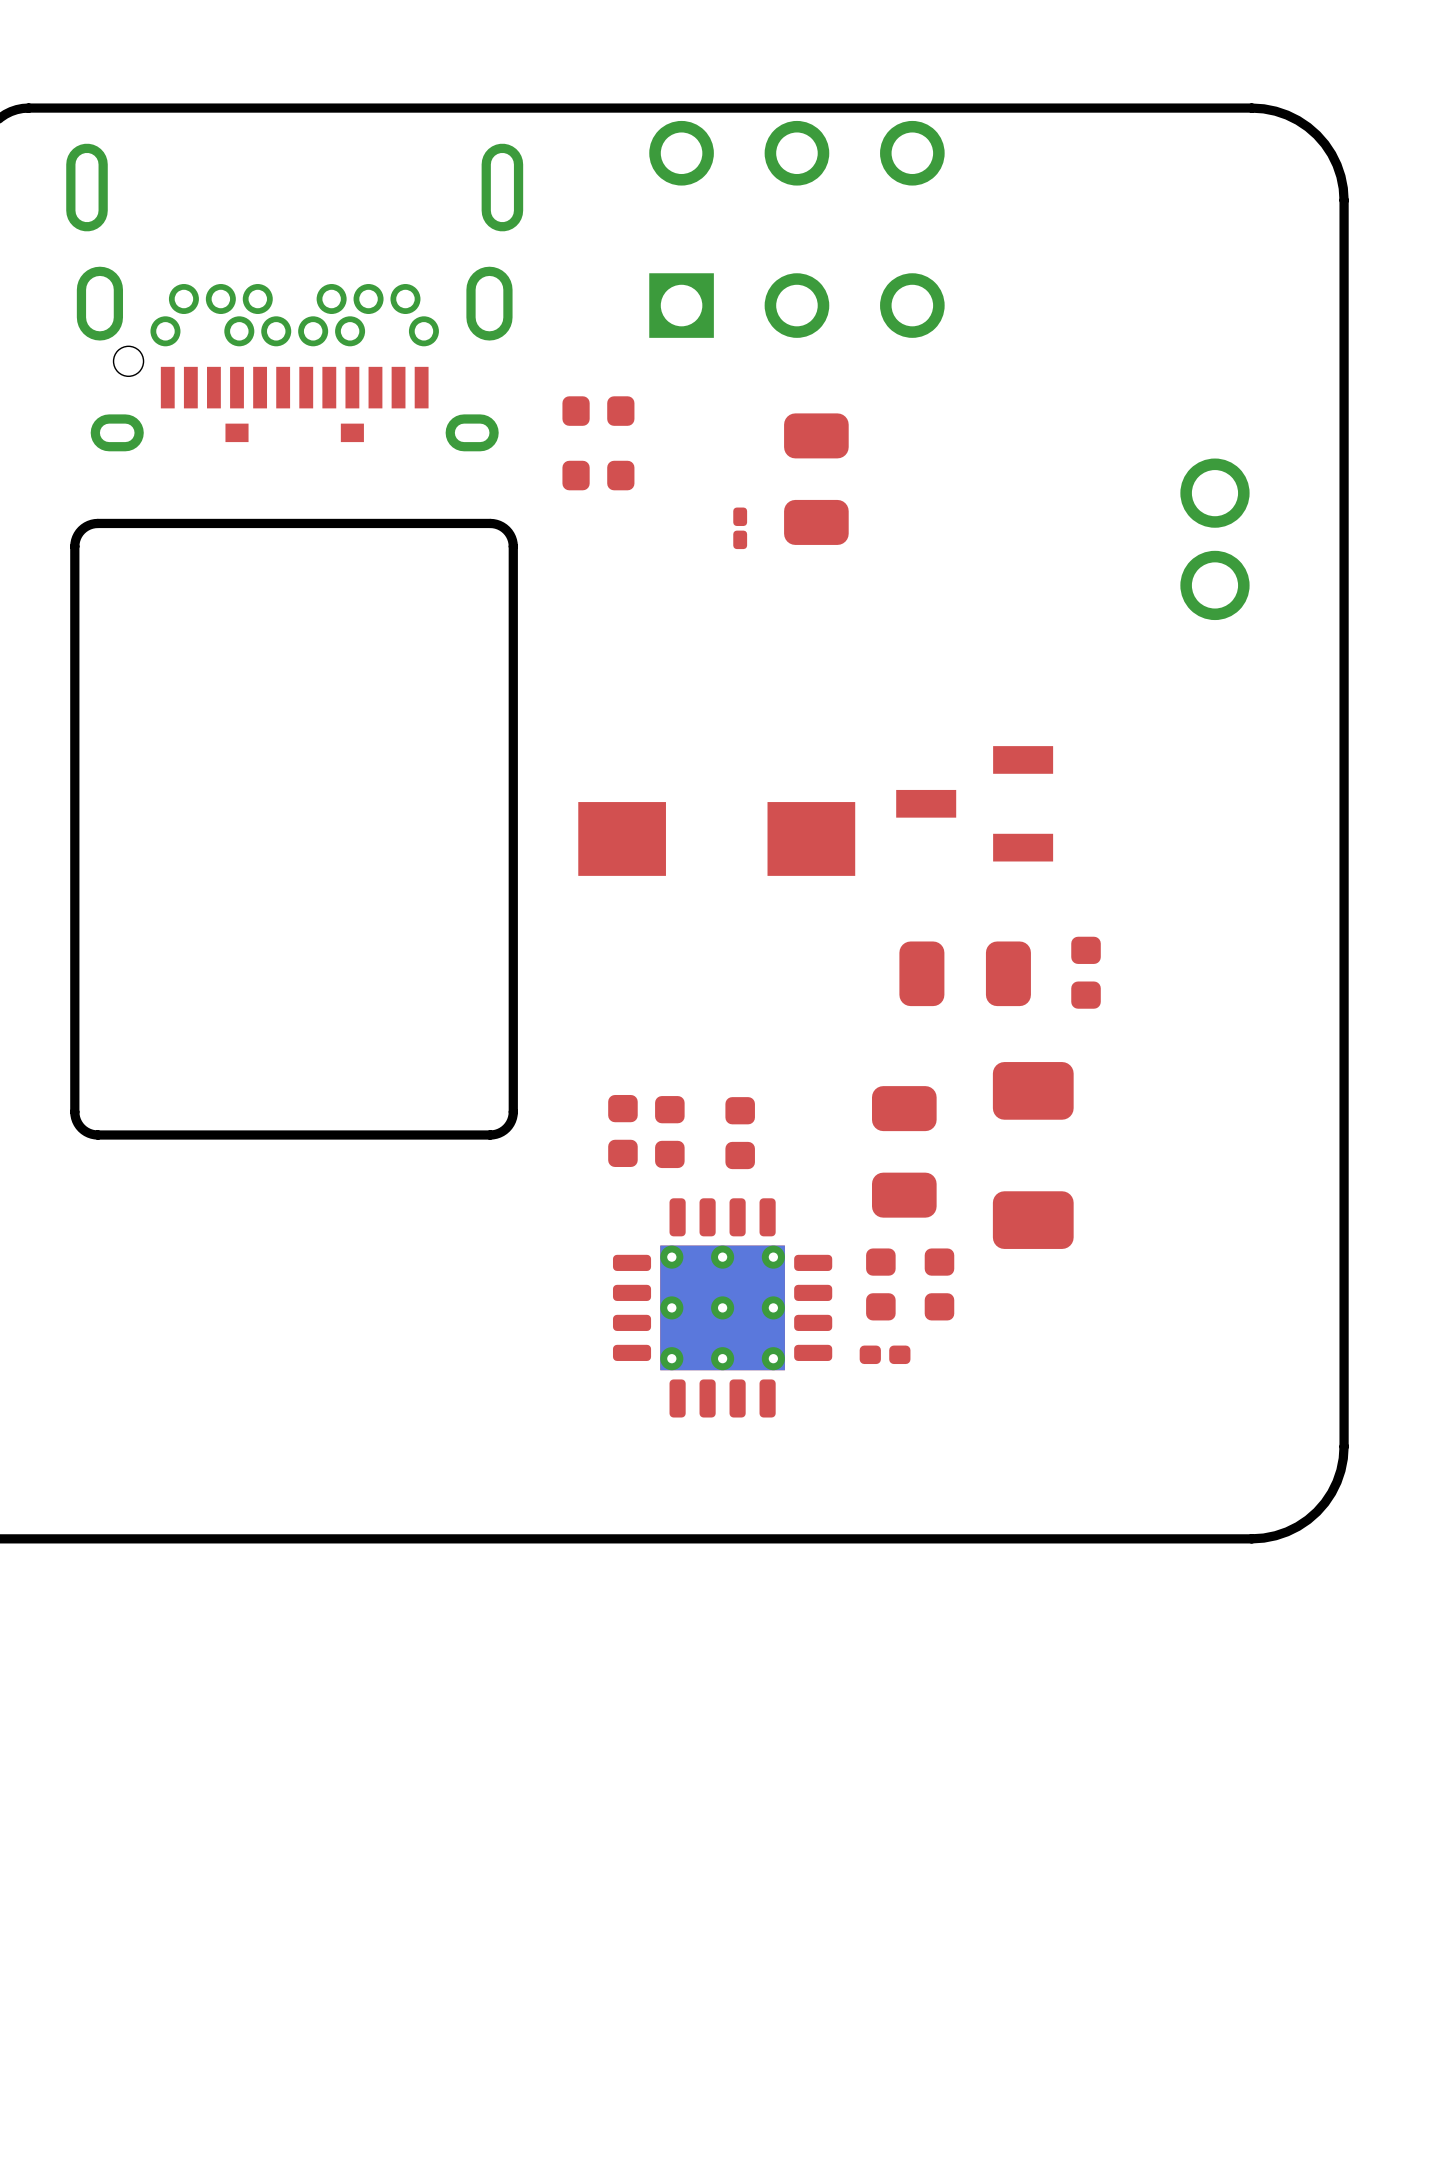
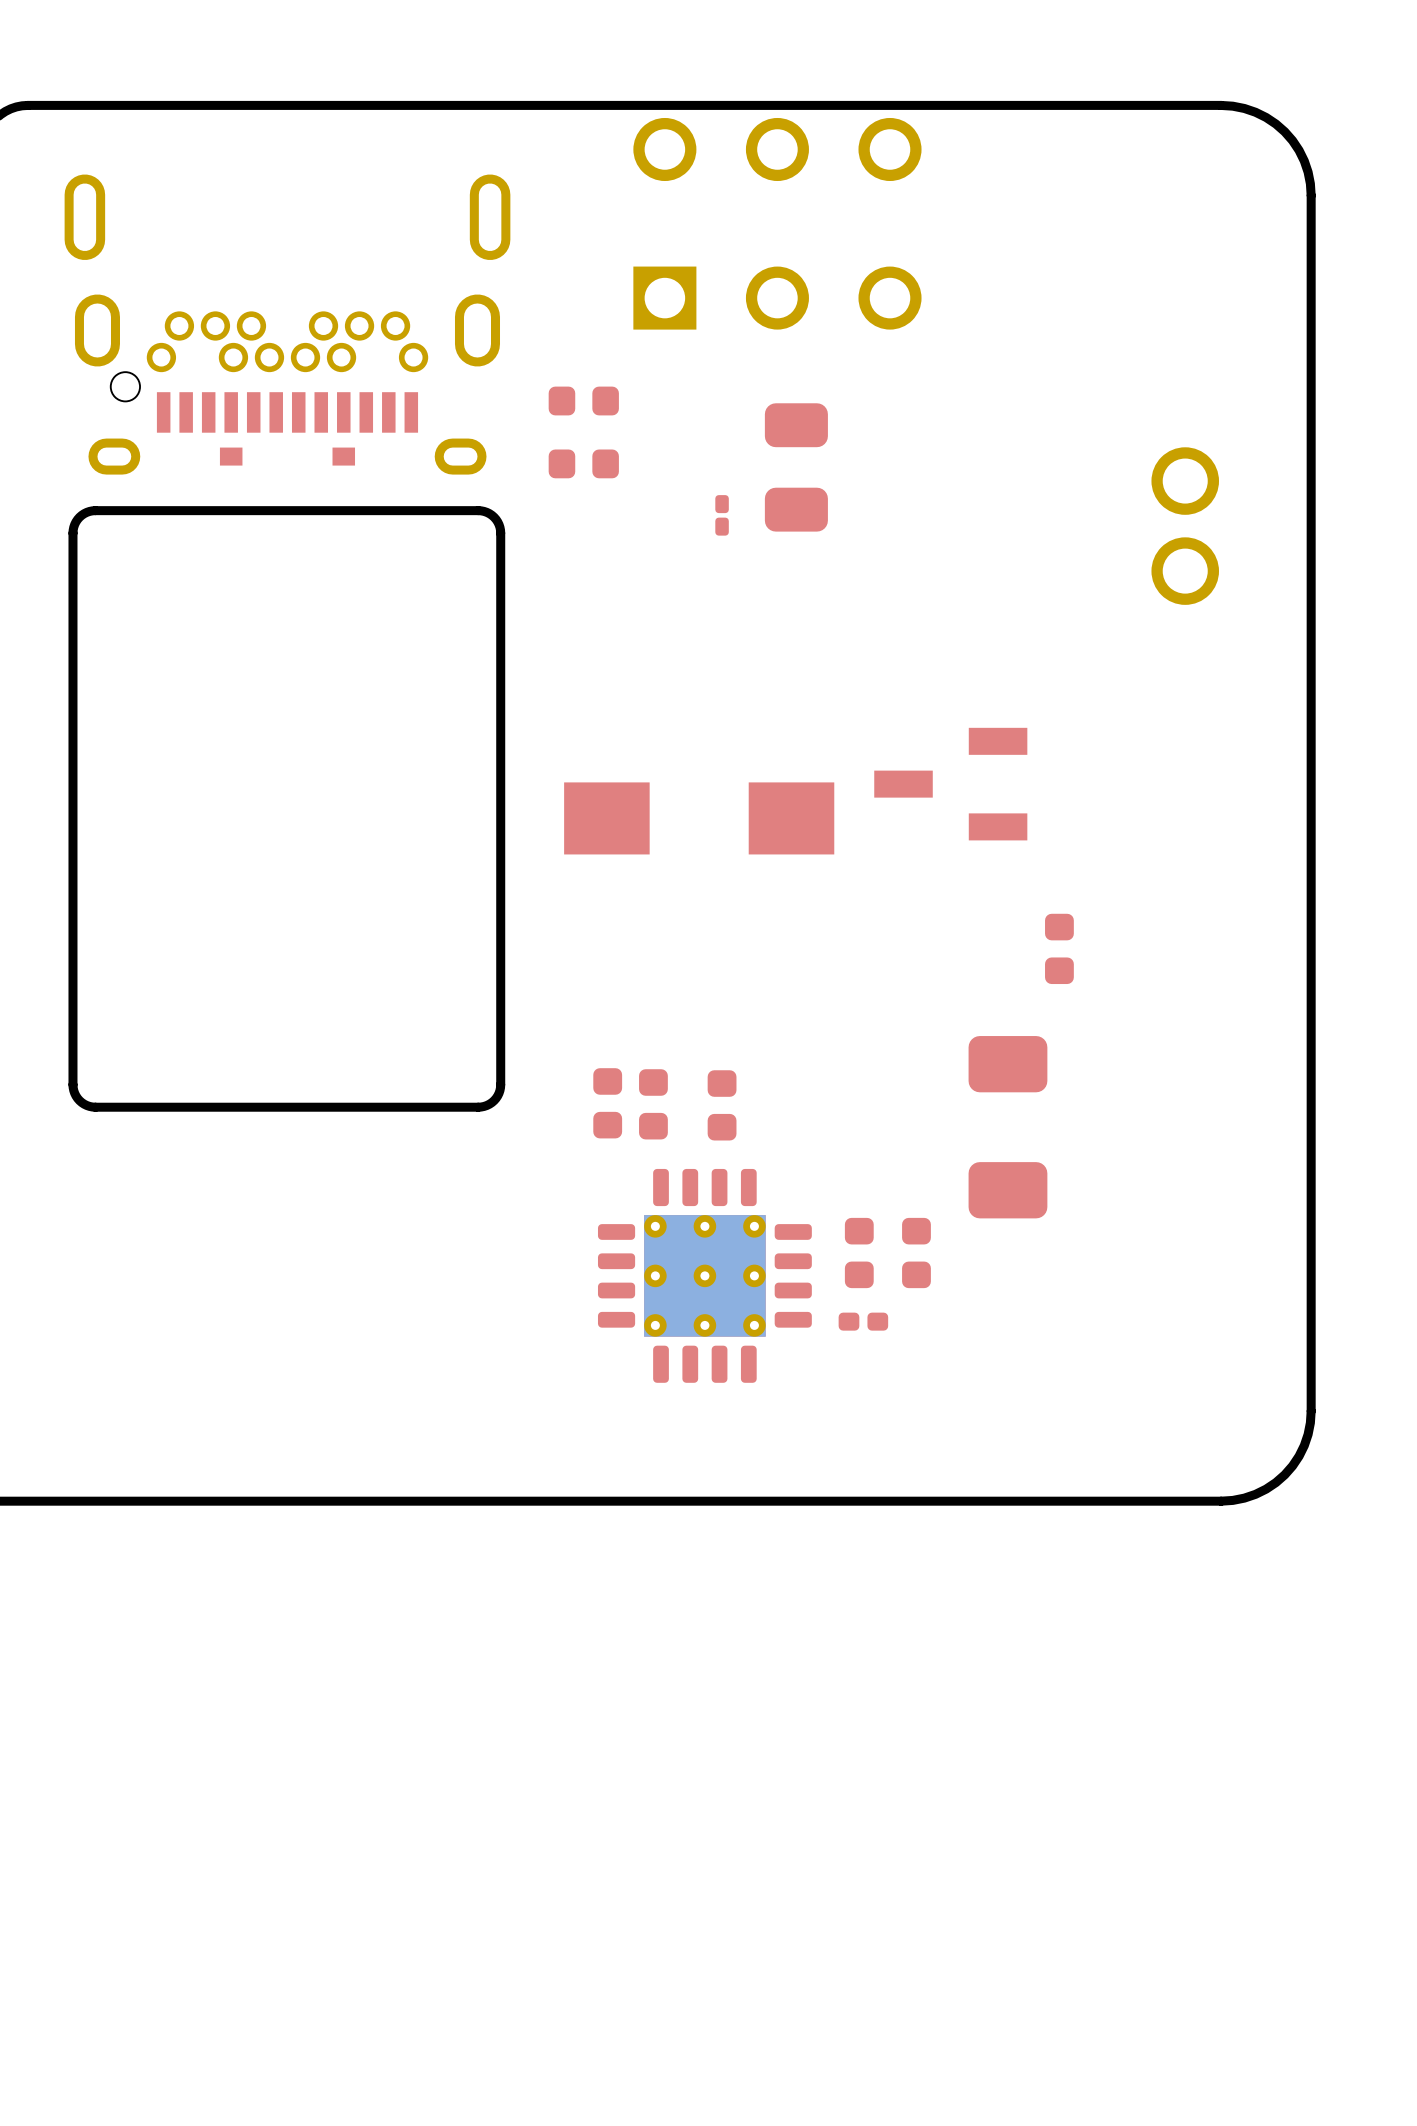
part position: (294, 297) -> (287, 324)
part: (965, 973) -> none
part: (904, 1151) -> none

